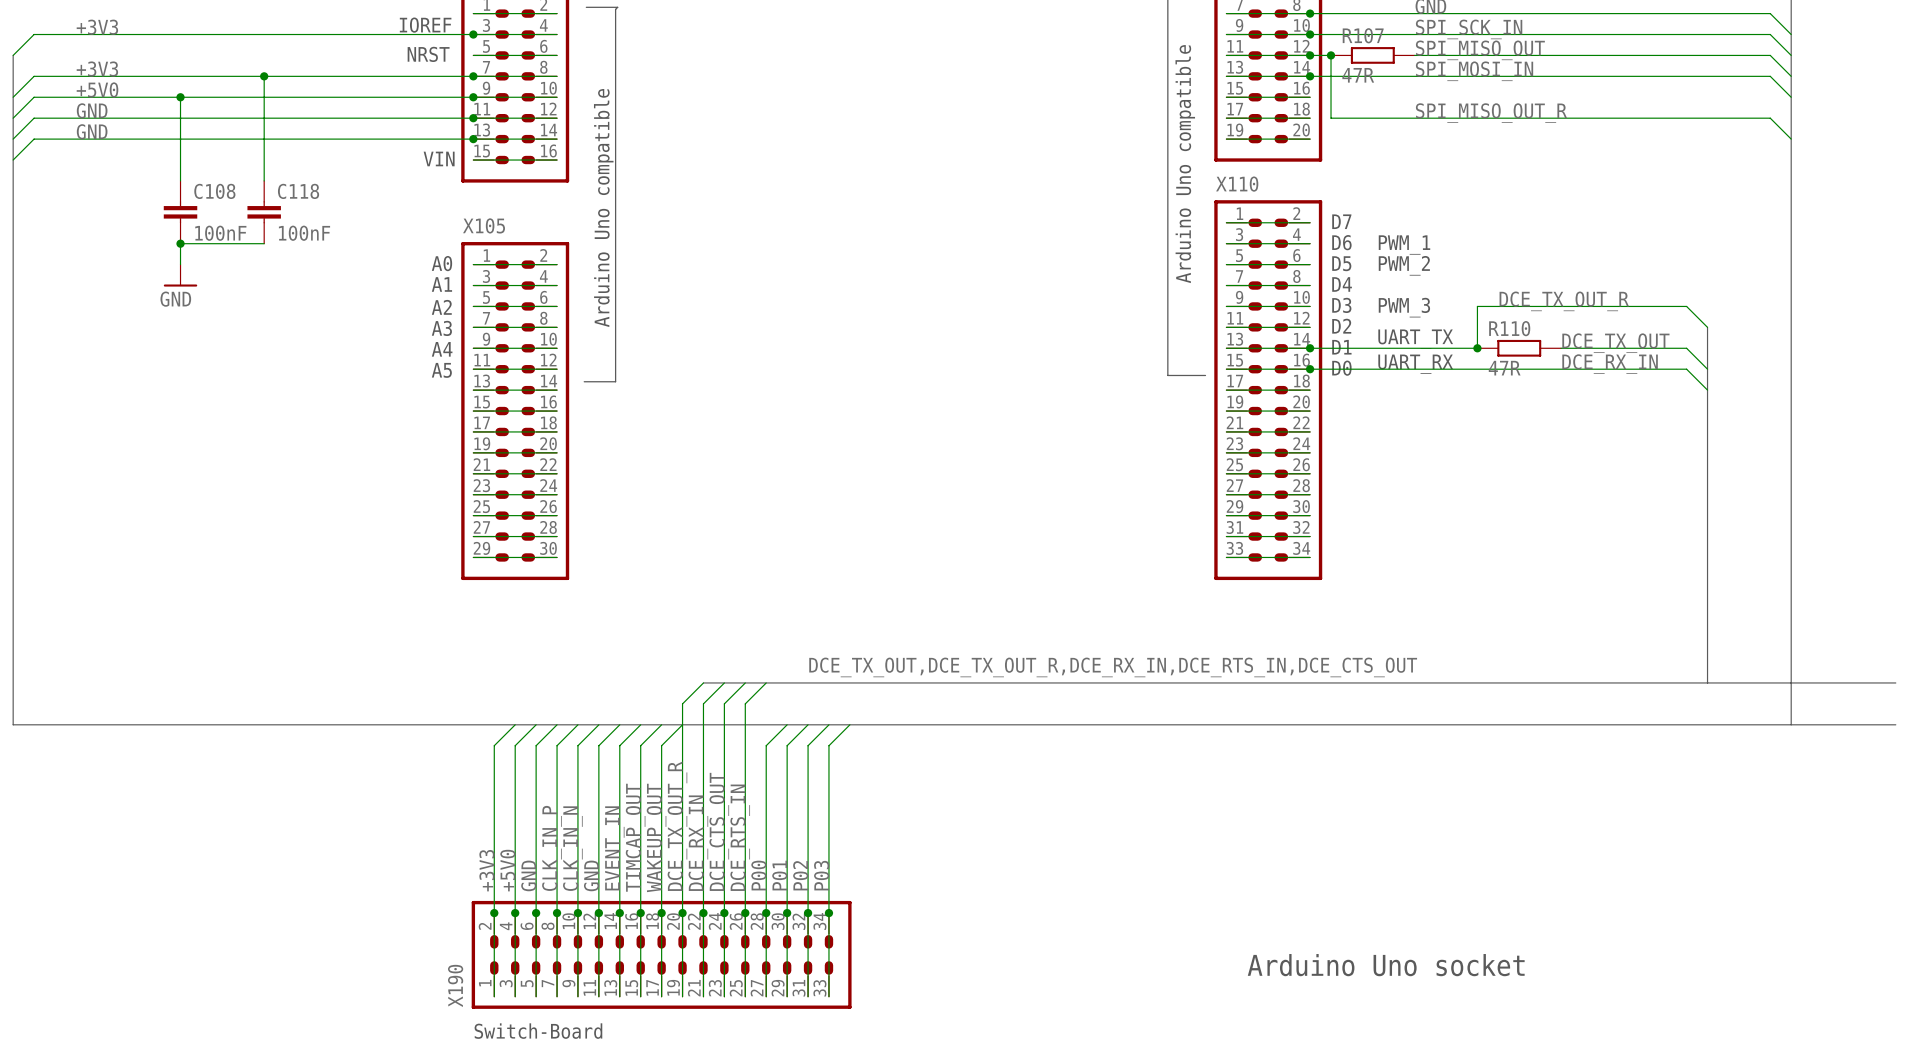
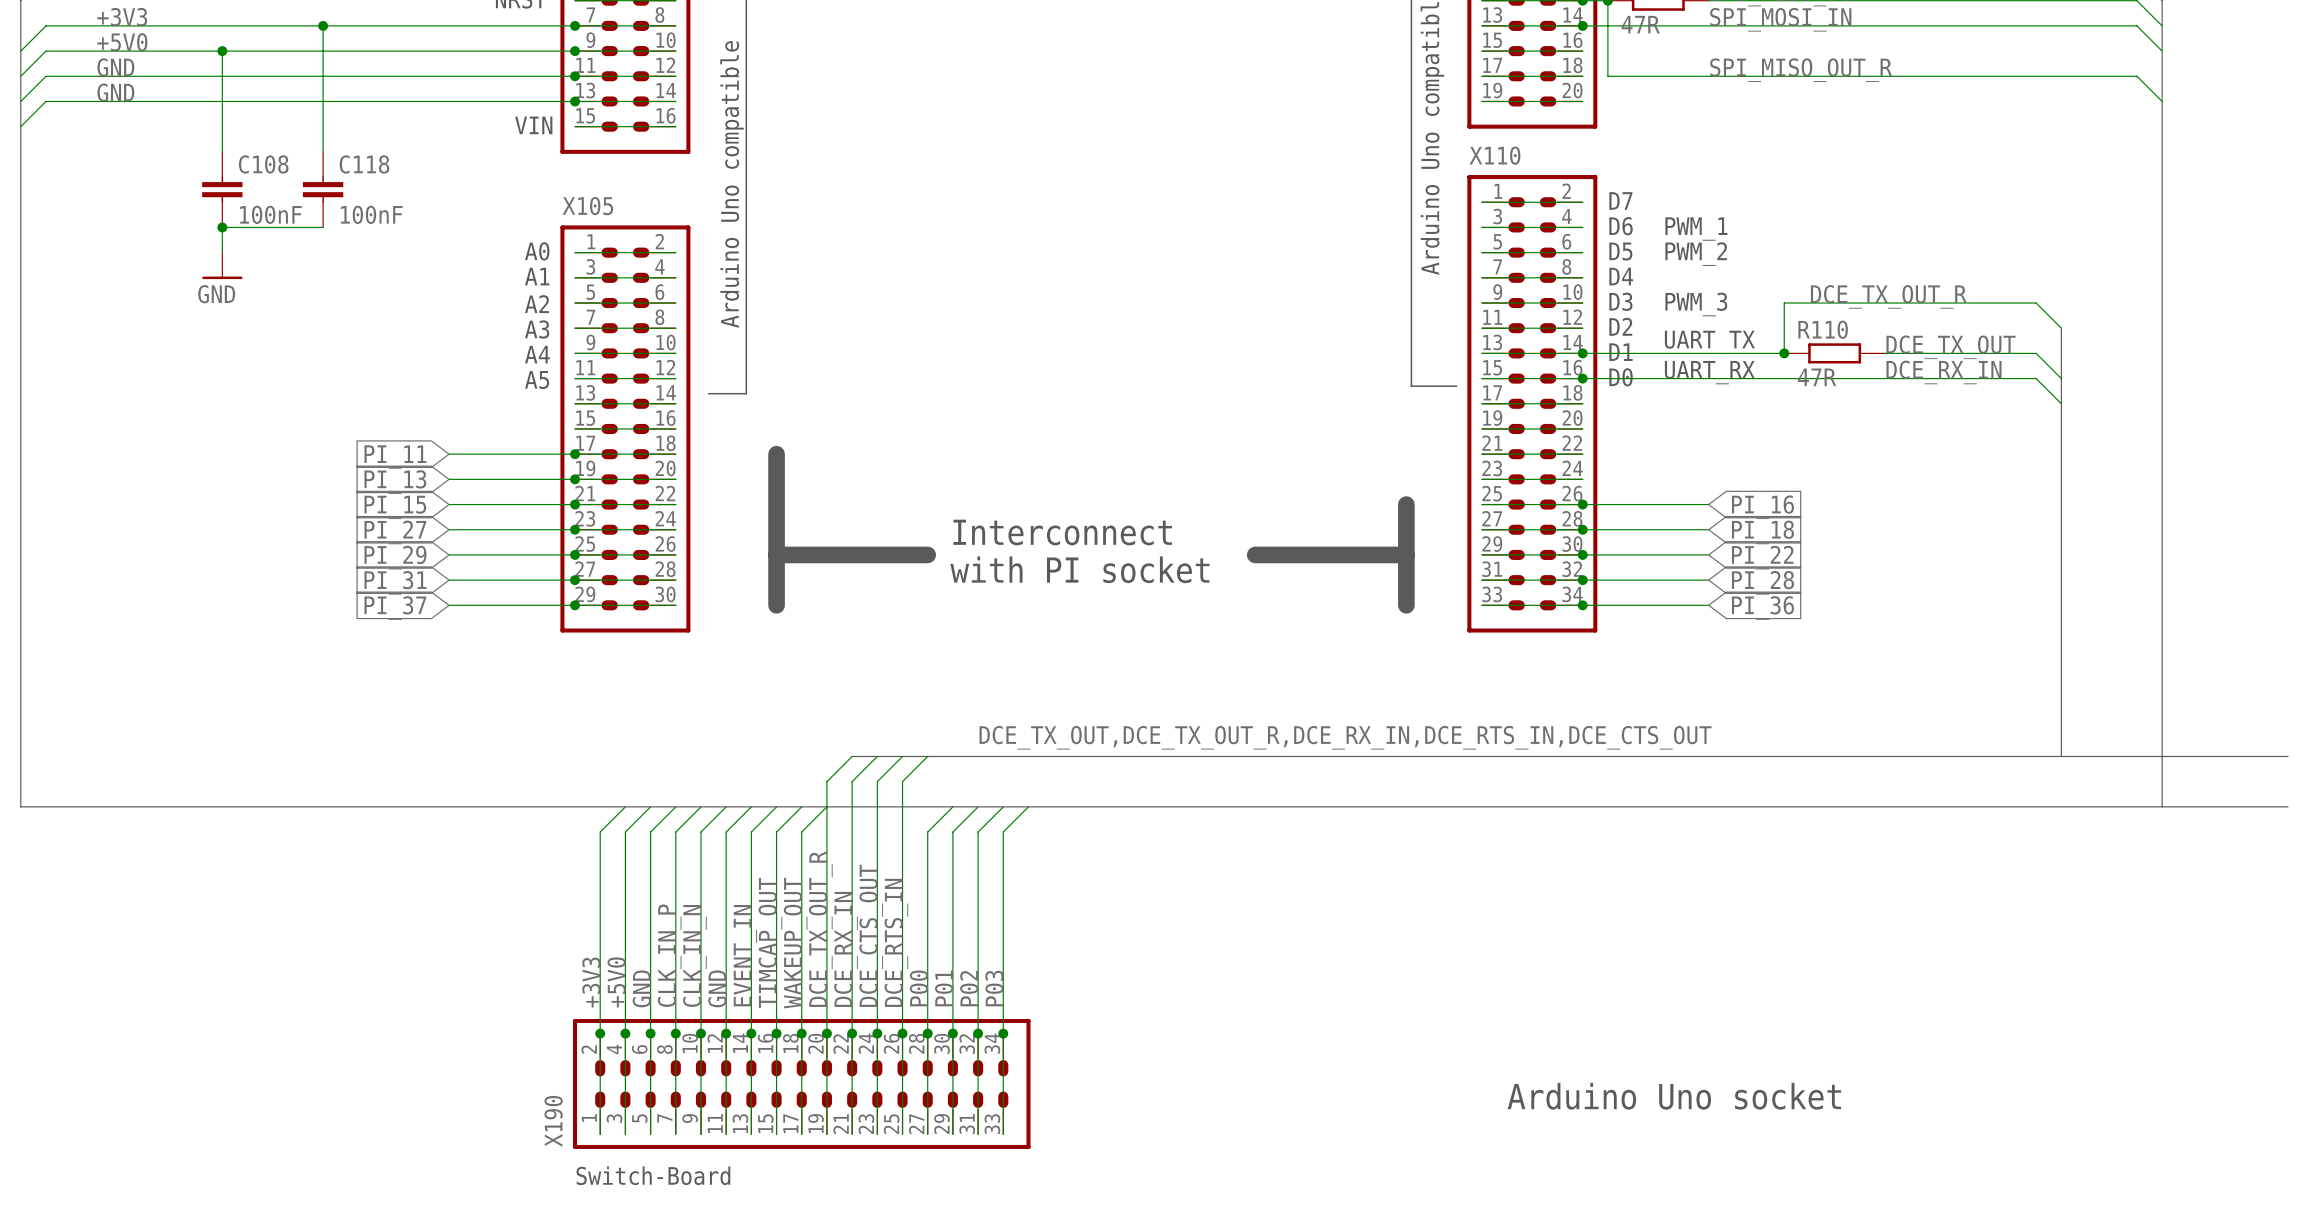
wire: none -> (449, 454) (575, 454)
junction: none -> (575, 454)
line: none -> (776, 454) (776, 605)
global label: none -> PI_11 (395, 457)
wire: none -> (449, 479) (575, 479)
junction: none -> (575, 479)
global label: none -> PI_13 (395, 482)
wire: none -> (449, 504) (575, 504)
junction: none -> (575, 504)
line: none -> (1406, 504) (1406, 605)
wire: none -> (1582, 504) (1708, 504)
junction: none -> (1582, 504)
global label: none -> PI_15 (395, 507)
global label: none -> PI_16 (1762, 507)
wire: none -> (449, 529) (575, 529)
junction: none -> (575, 529)
wire: none -> (1582, 529) (1708, 529)
junction: none -> (1582, 529)
global label: none -> PI_27 (395, 532)
global label: none -> PI_18 (1762, 532)
text: none -> Interconnect (1062, 532)
wire: none -> (449, 554) (575, 554)
junction: none -> (575, 554)
line: none -> (776, 554) (927, 554)
line: none -> (1255, 554) (1406, 554)
wire: none -> (1582, 554) (1708, 554)
junction: none -> (1582, 554)
global label: none -> PI_29 (395, 557)
global label: none -> PI_22 (1762, 557)
text: none -> with PI socket (1079, 569)
wire: none -> (449, 580) (575, 580)
junction: none -> (575, 580)
wire: none -> (1582, 580) (1708, 580)
junction: none -> (1582, 580)
global label: none -> PI_31 (395, 582)
global label: none -> PI_28 (1762, 582)
wire: none -> (449, 605) (575, 605)
junction: none -> (575, 605)
wire: none -> (1582, 605) (1708, 605)
junction: none -> (1582, 605)
global label: none -> PI_37 (395, 608)
global label: none -> PI_36 (1762, 608)

